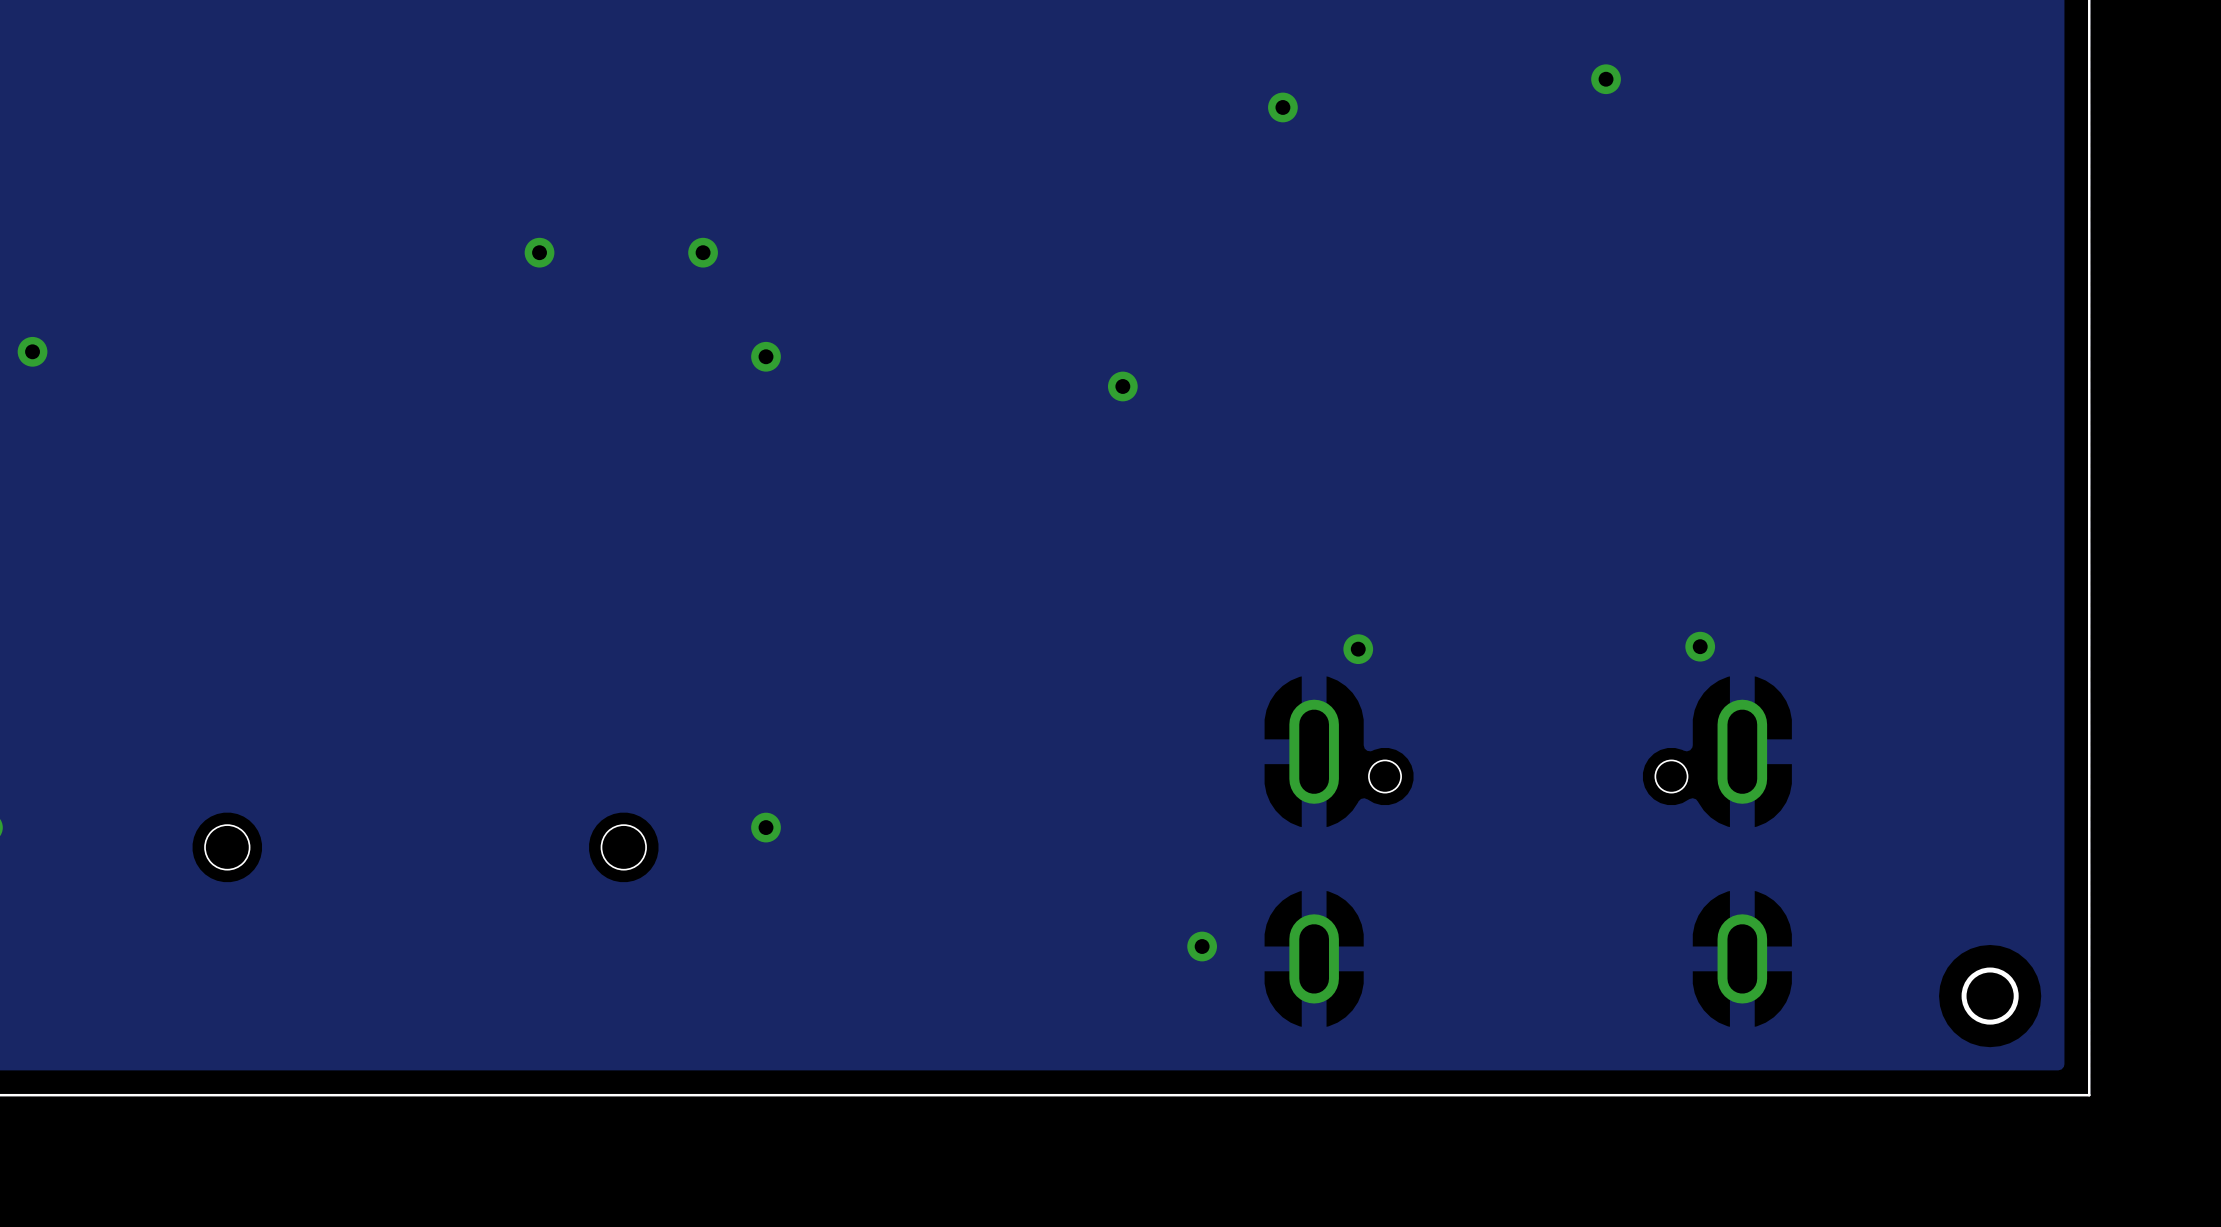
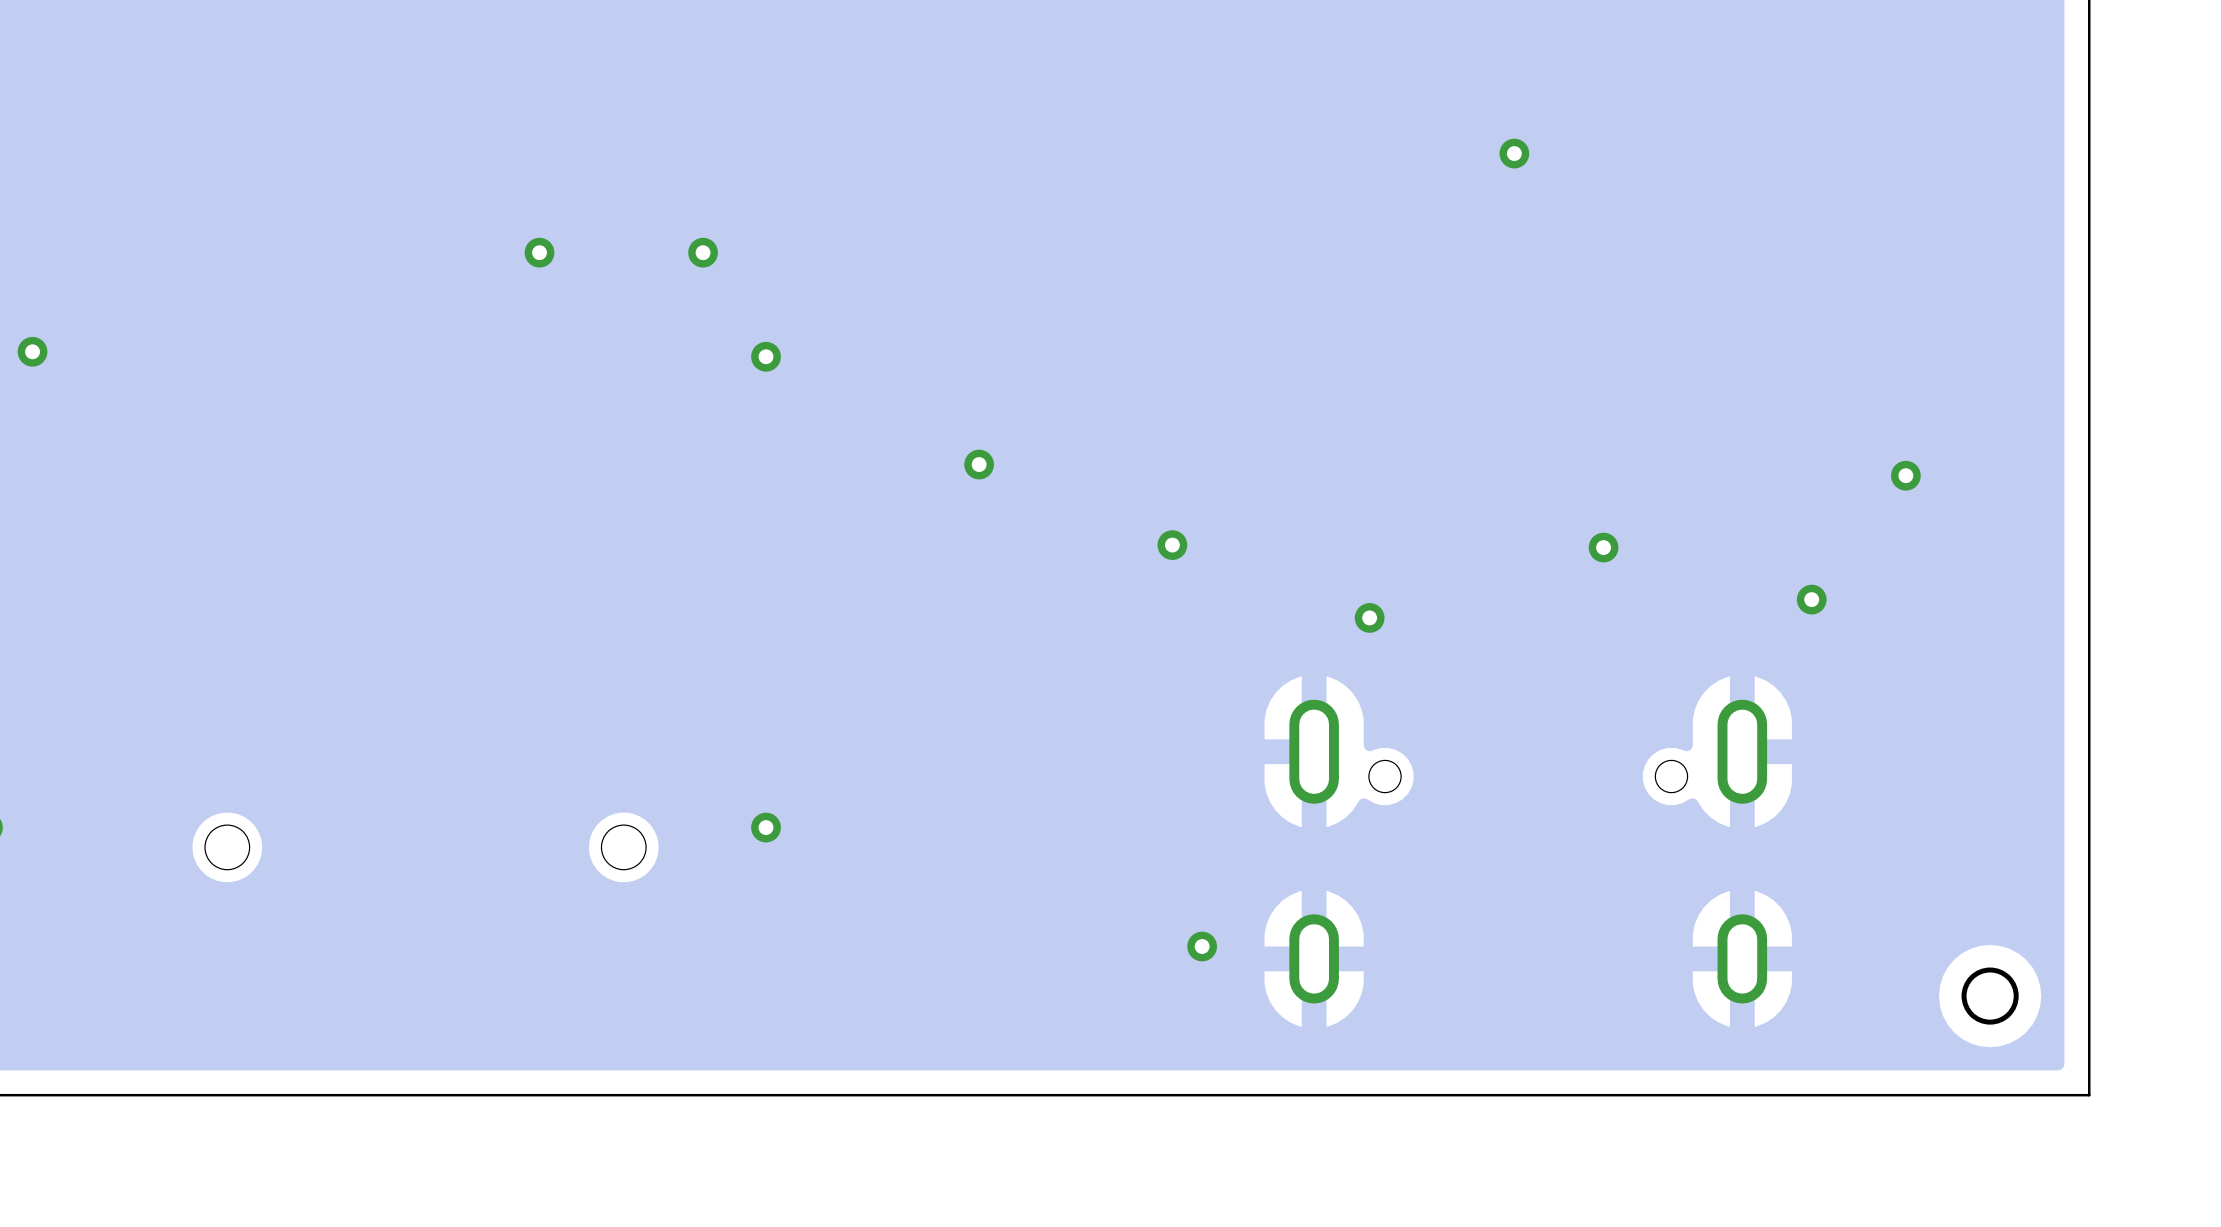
via: (1606, 79) -> none
via: (1282, 107) -> none
via: none -> (1514, 153)
via: (1122, 386) -> none
via: none -> (979, 464)
via: none -> (1905, 475)
via: none -> (1172, 545)
via: none -> (1603, 547)
via: none -> (1811, 599)
via: (1700, 646) -> none
via position: (1358, 649) -> (1369, 617)

